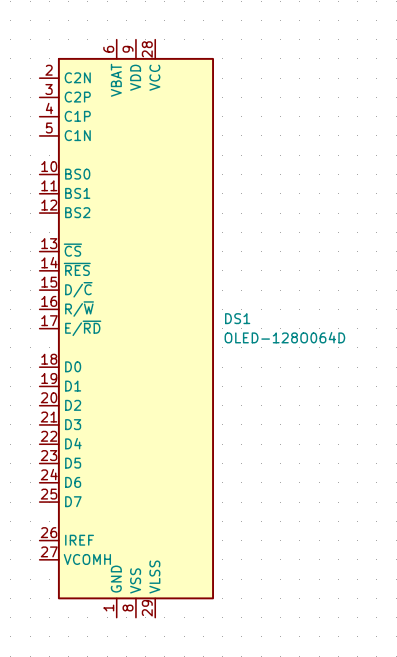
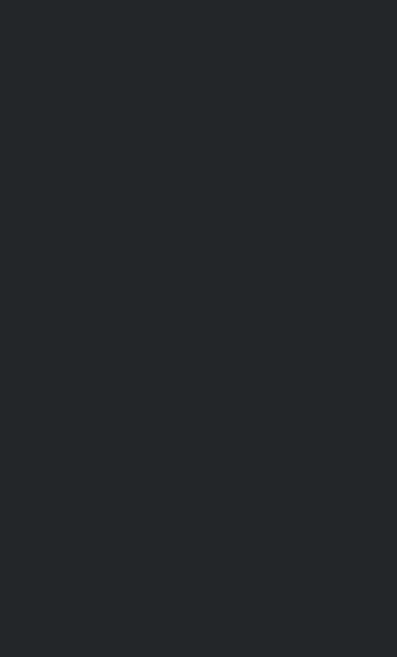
DS1: OLED-128O064D (126, 328) -> none

